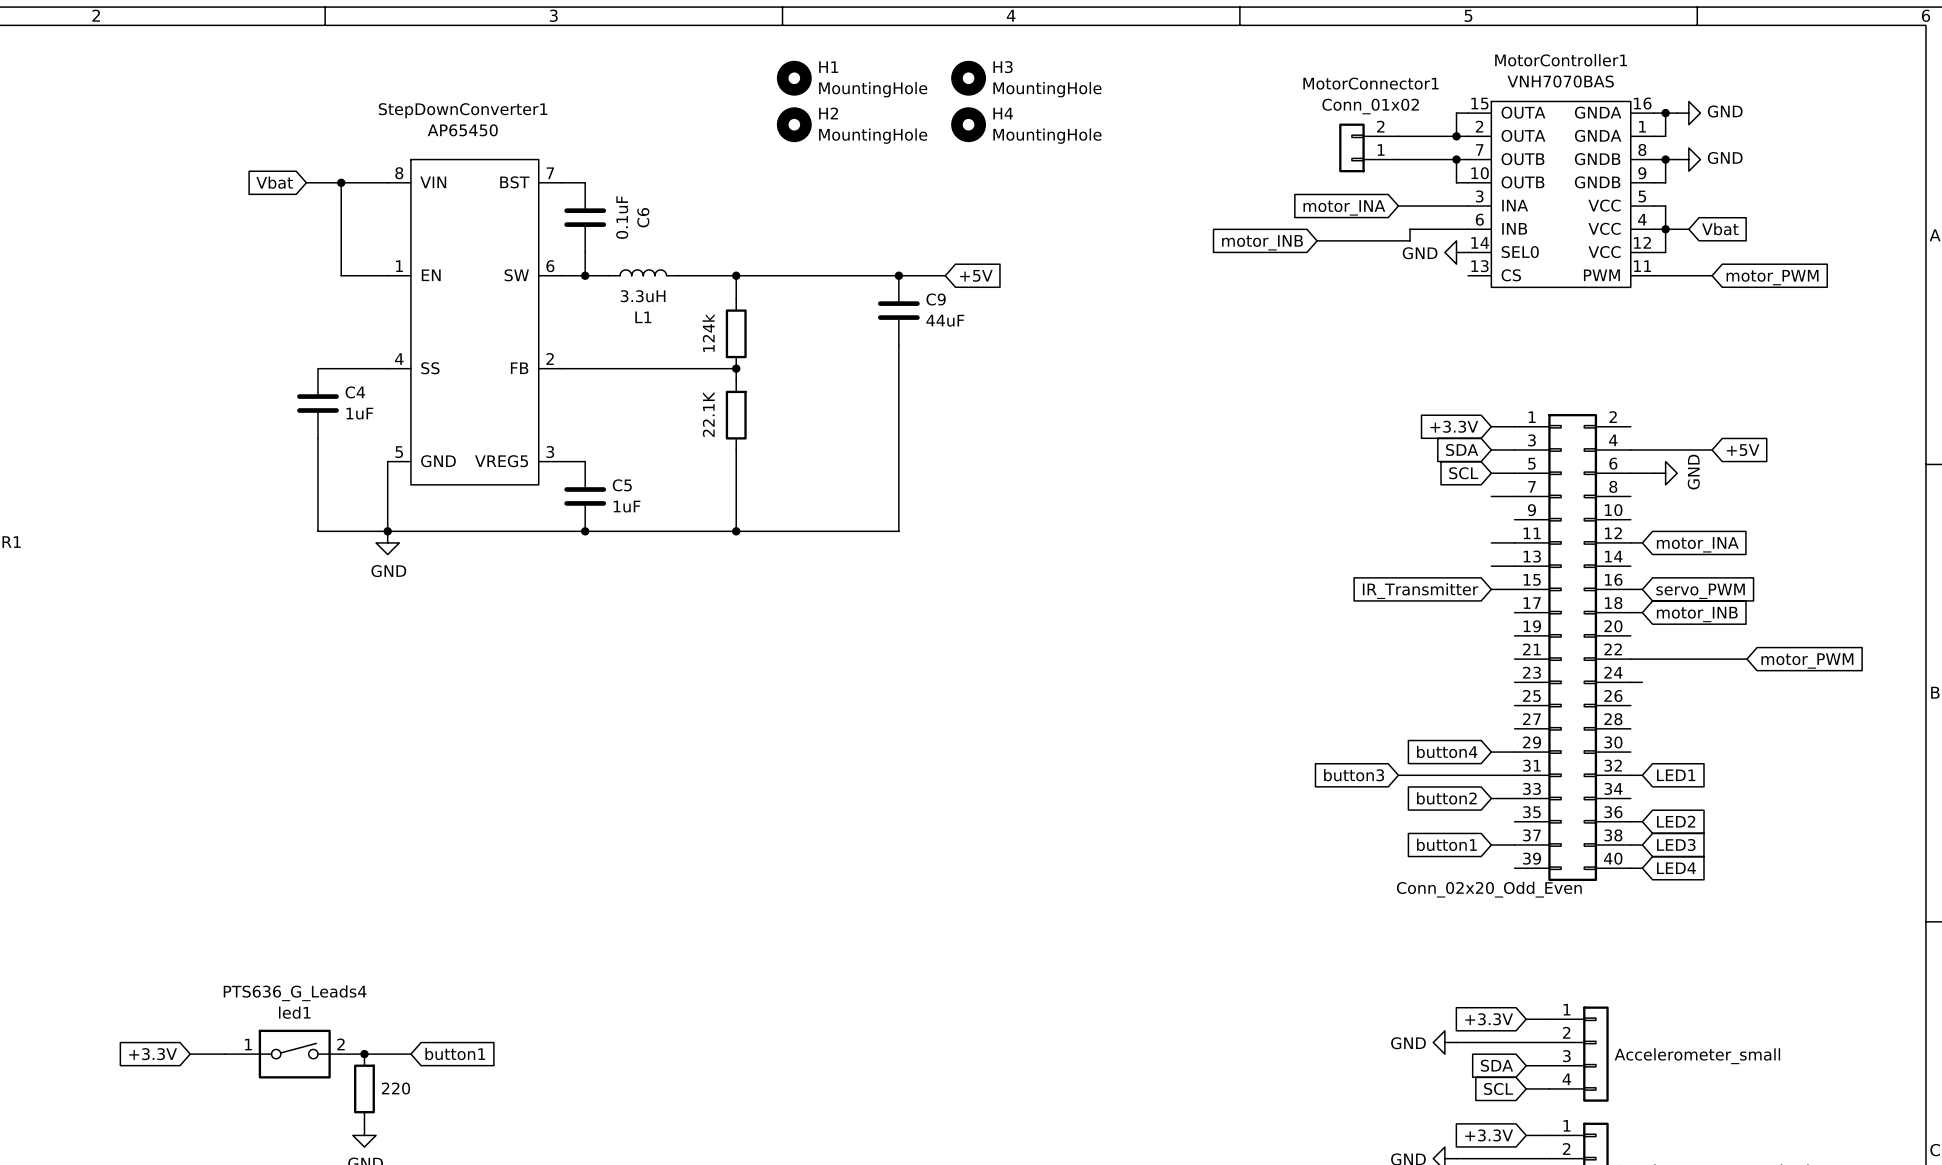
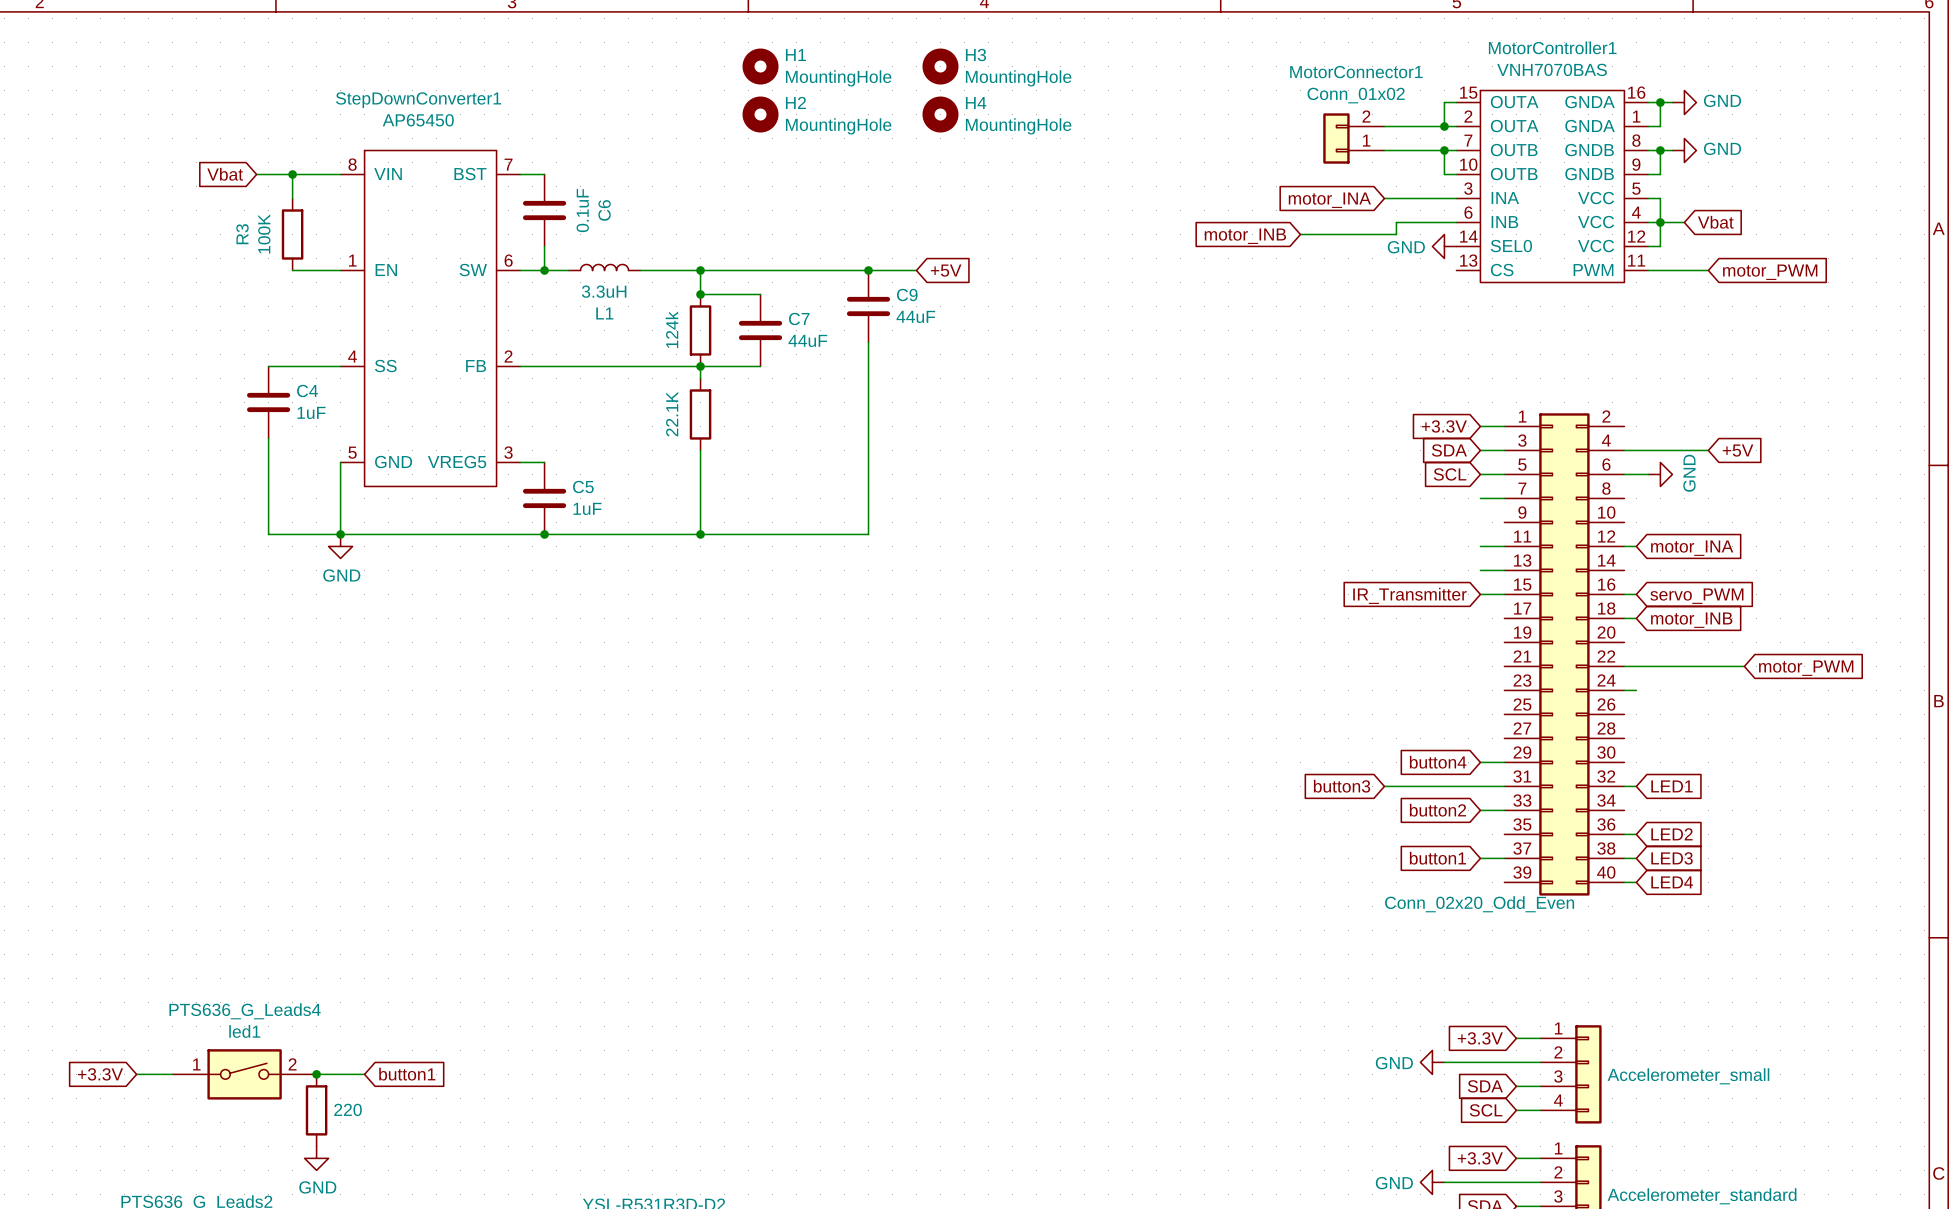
wire: (341, 206) (341, 275) -> none
R3: none -> 100K (292, 234)
wire: none -> (700, 294) (760, 294)
junction: none -> (700, 294)
C7: none -> 44uF (760, 330)
wire: none -> (700, 366) (760, 366)

